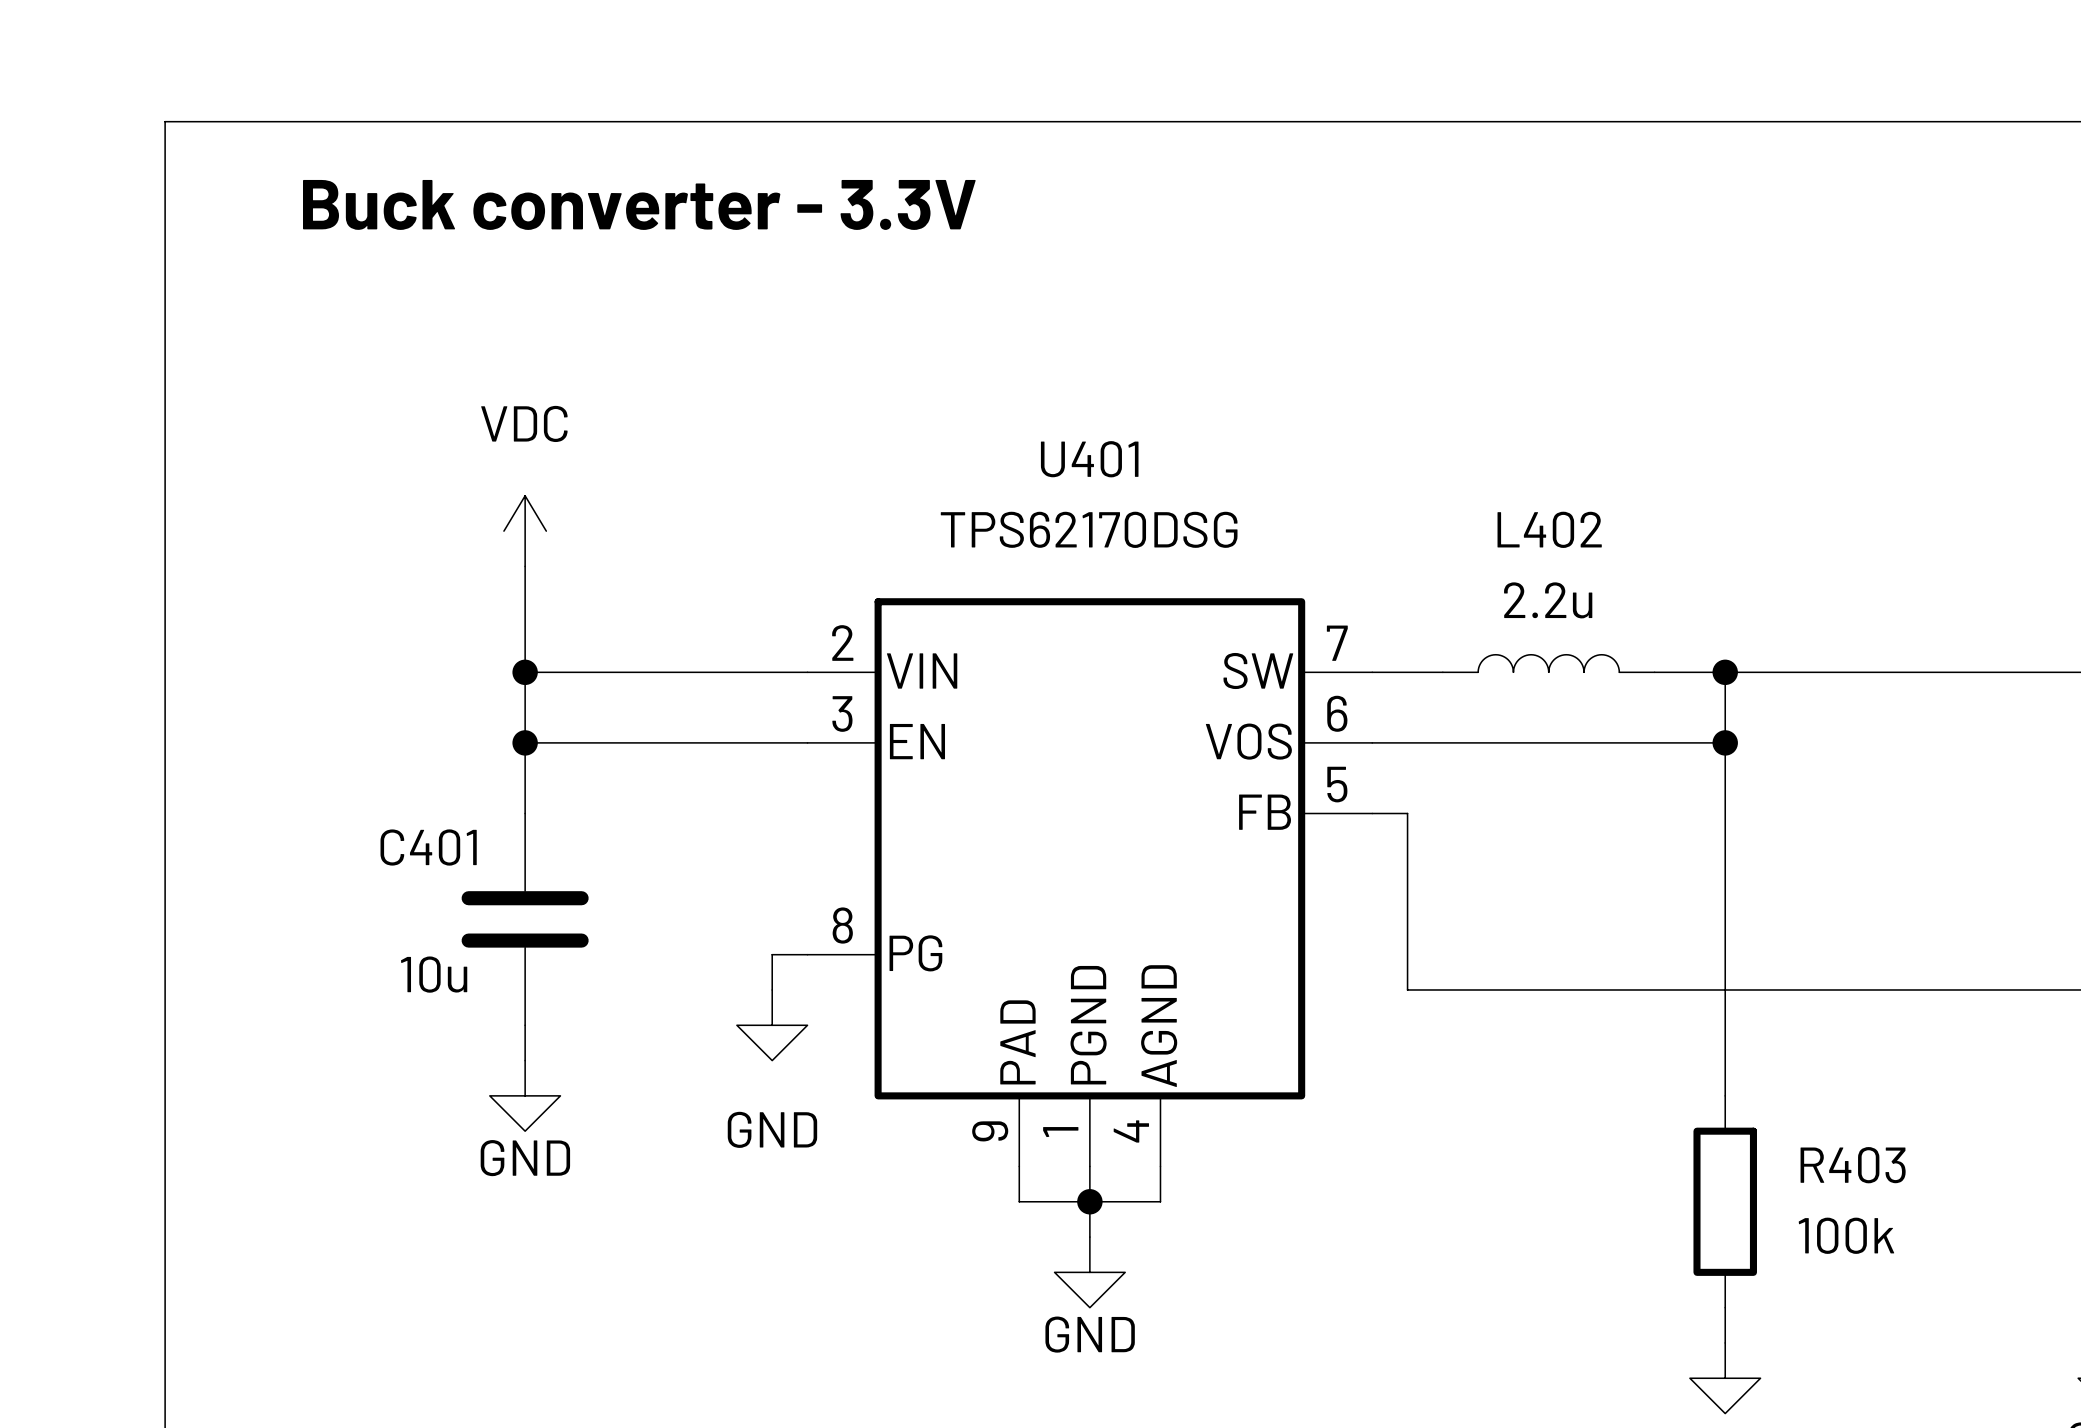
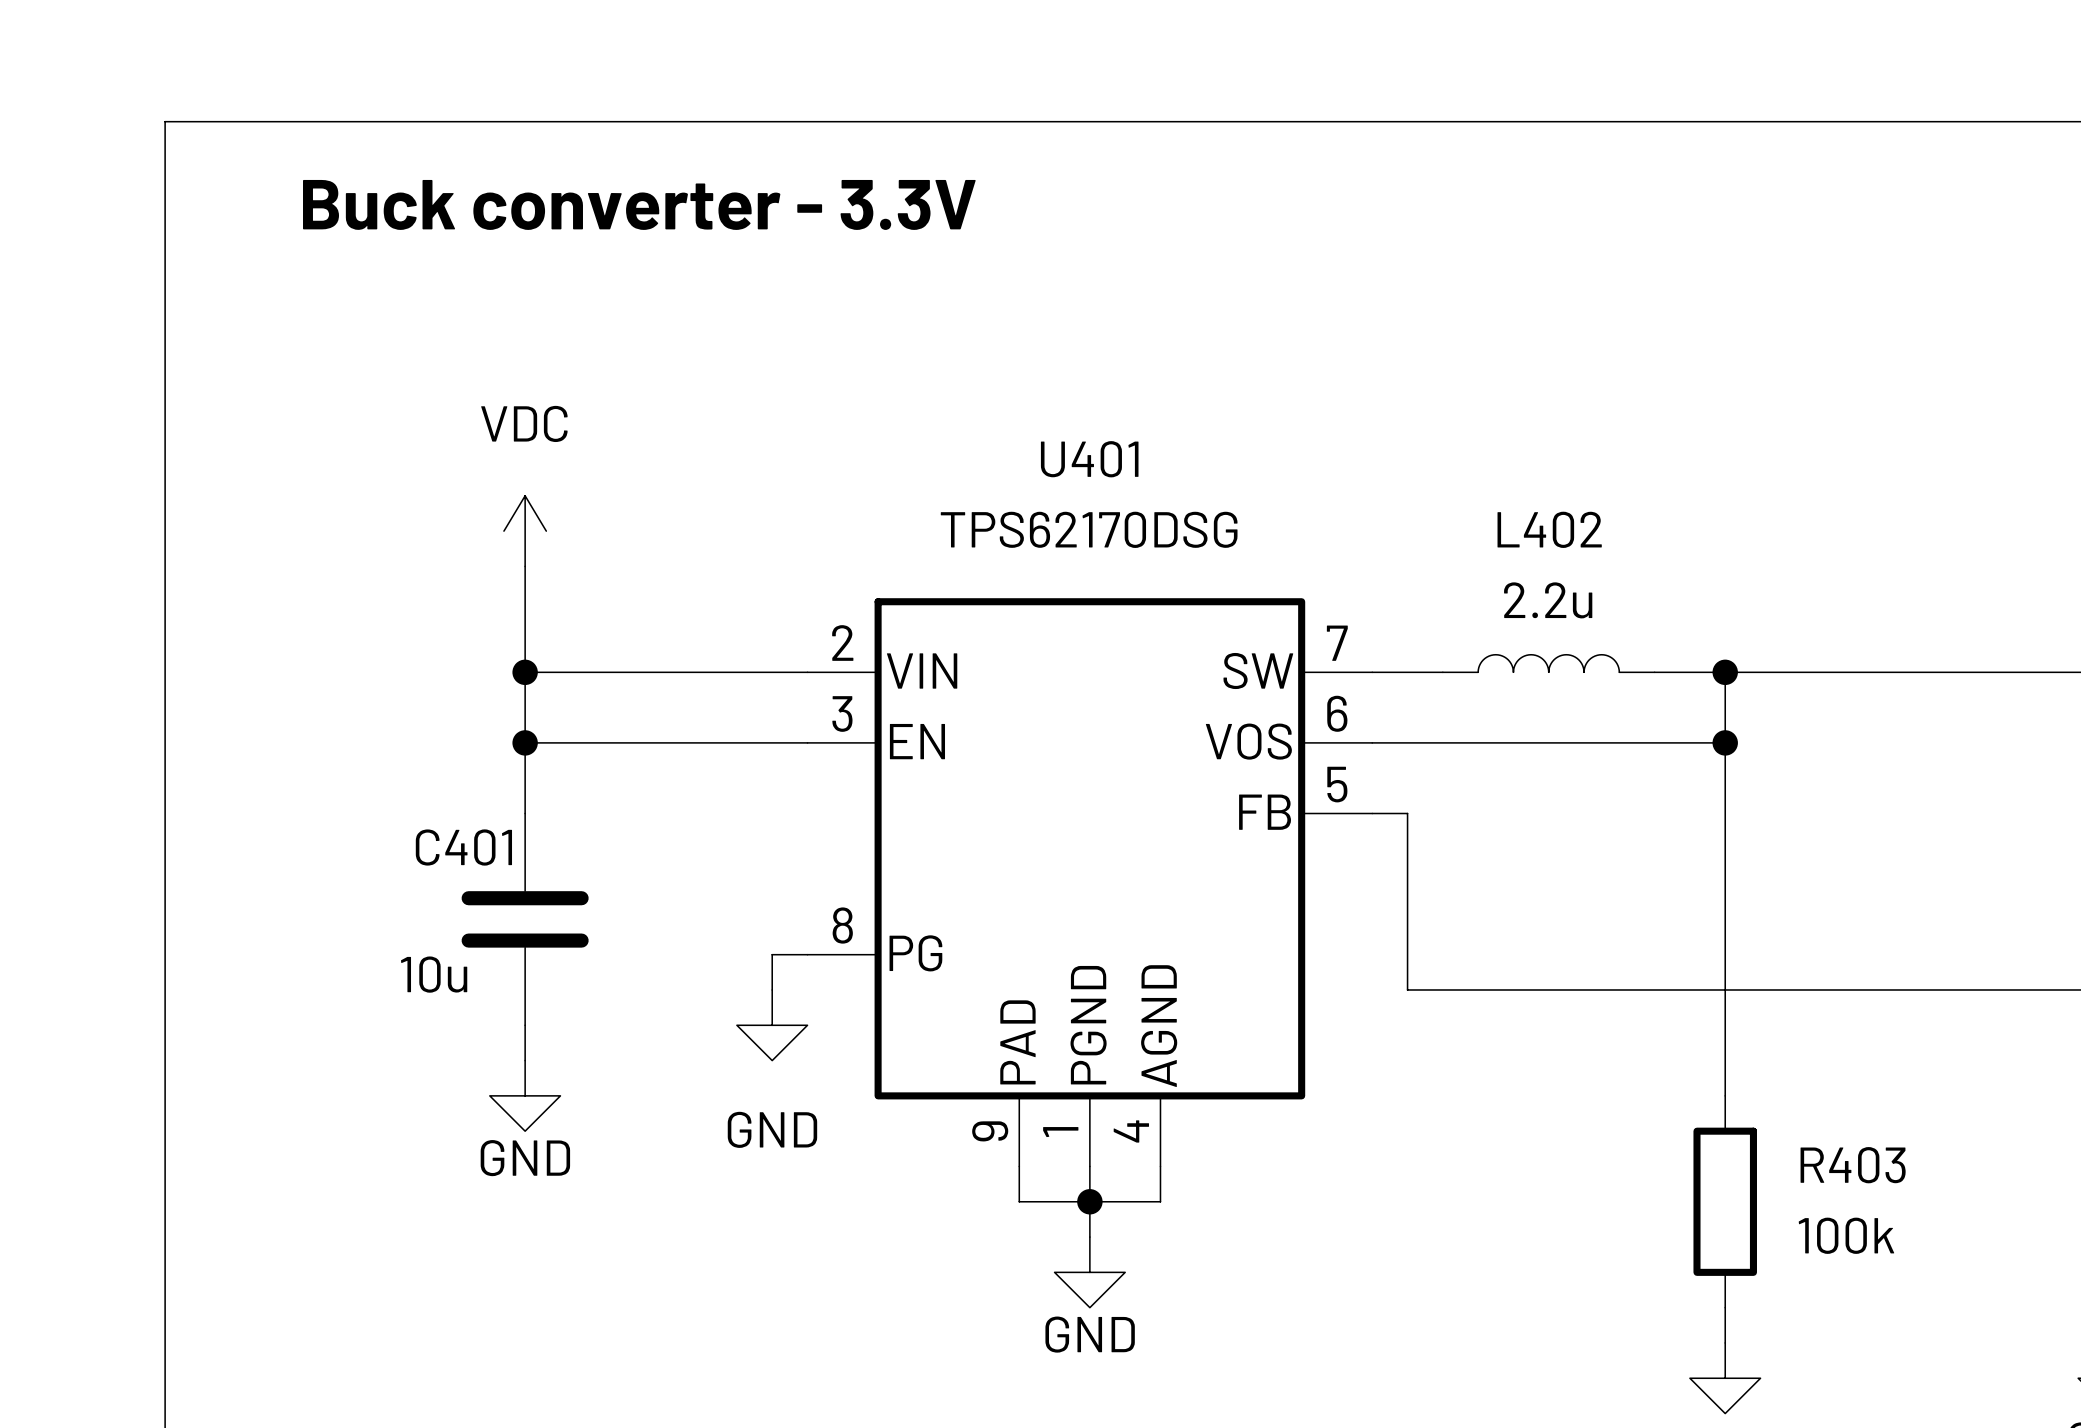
C401 name position: C401 (428, 847) -> C401 (463, 847)

